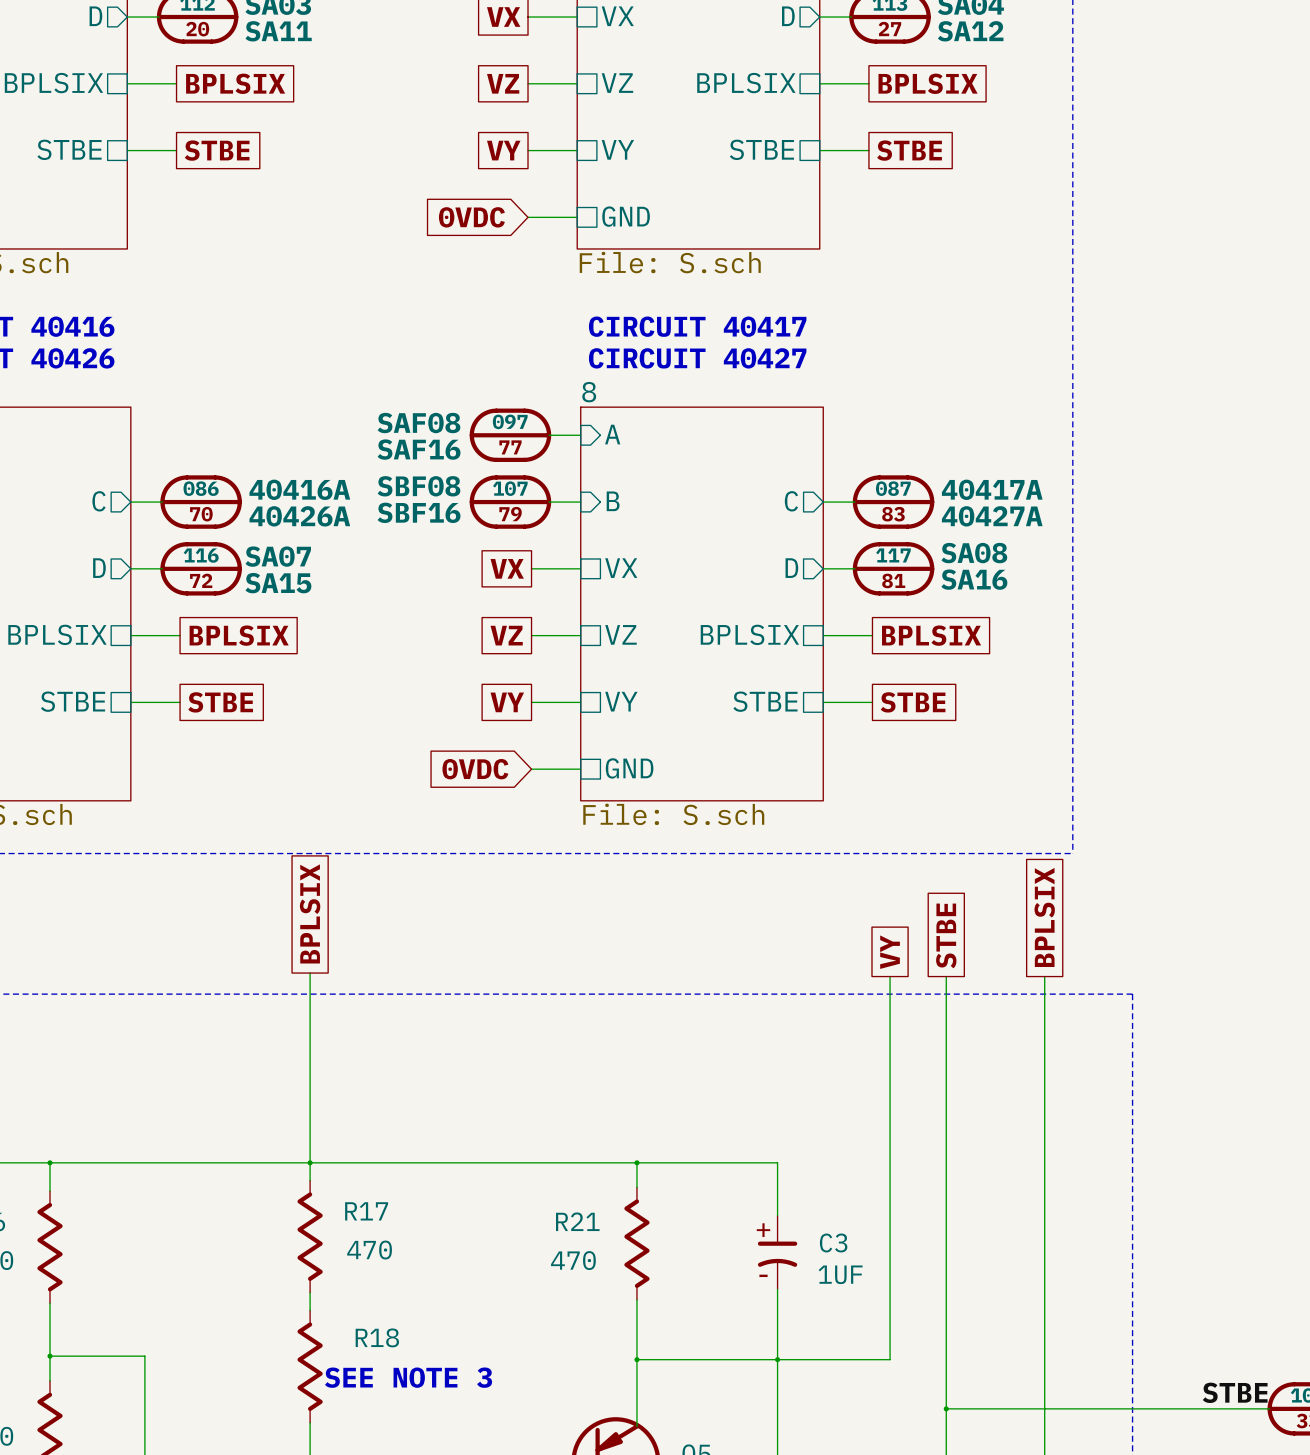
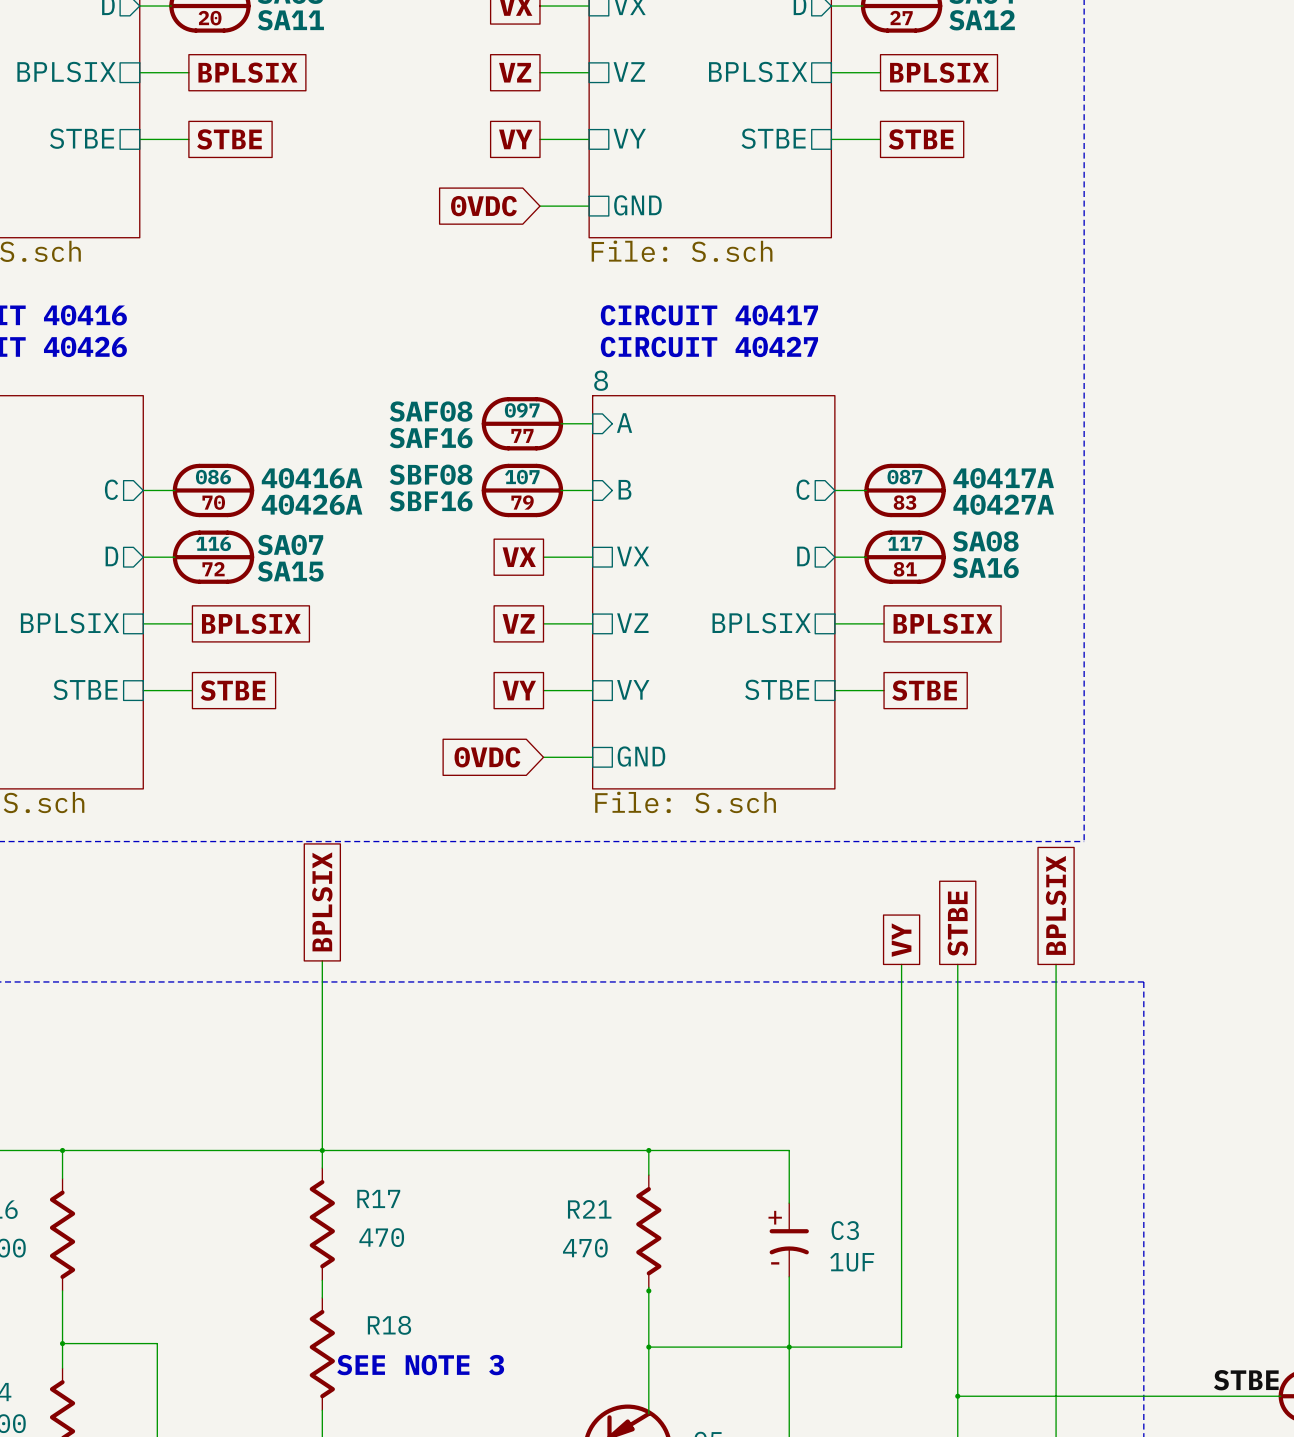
junction: none -> (648, 1290)

